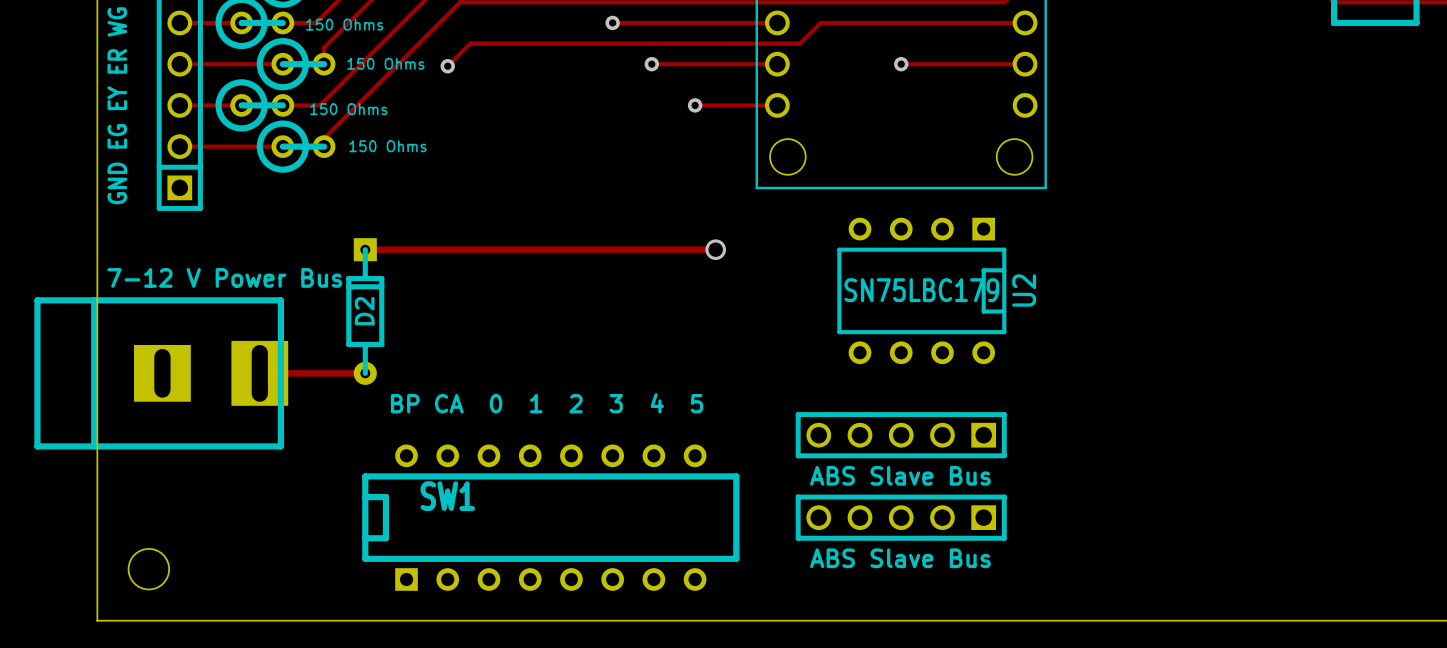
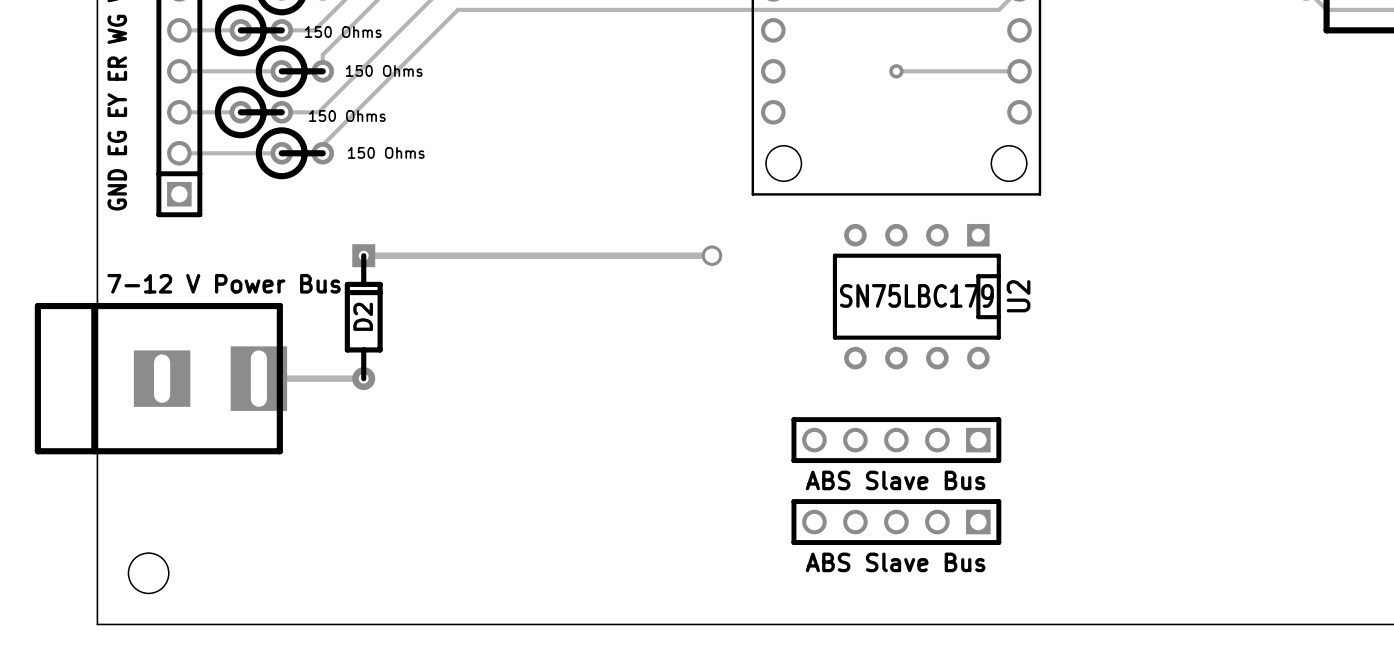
track: (612, 22) (777, 22) -> none
via: (612, 22) -> none
track: (1025, 22) (820, 22) (800, 43) (470, 43) (447, 66) -> none
track: (651, 64) (777, 64) -> none
via: (651, 64) -> none
via: (447, 66) -> none
track: (695, 105) (777, 105) -> none
via: (695, 105) -> none
SW1: BP CA 0 1 2 3 4 5 (550, 517) -> none

